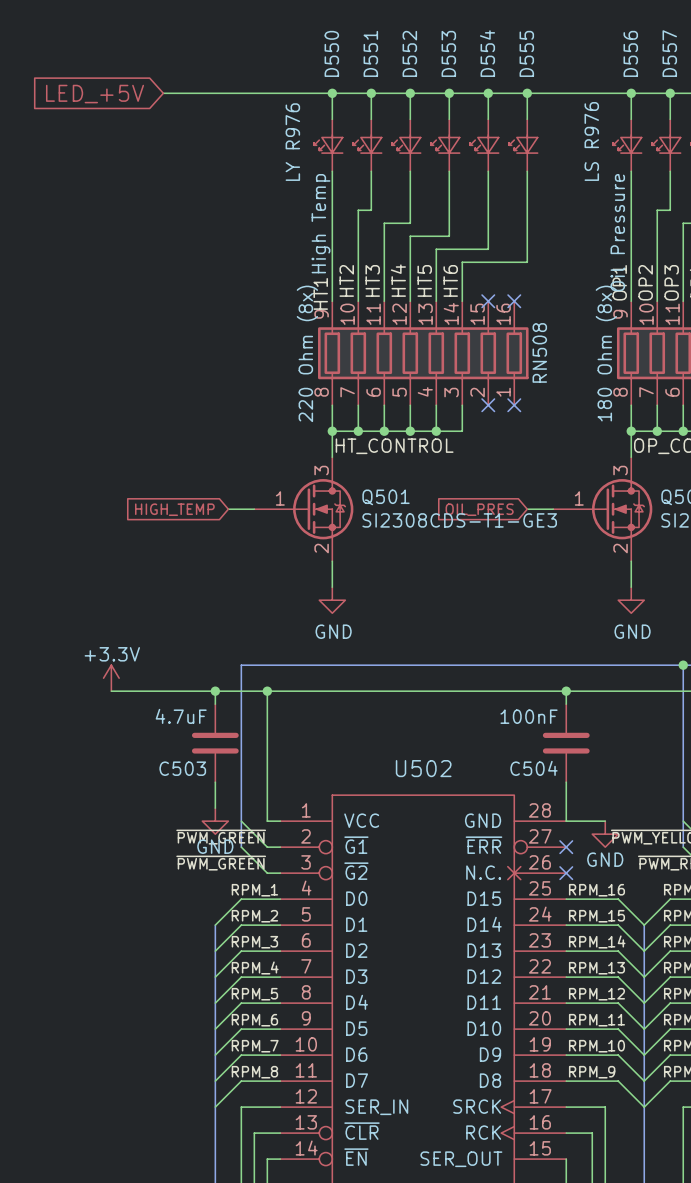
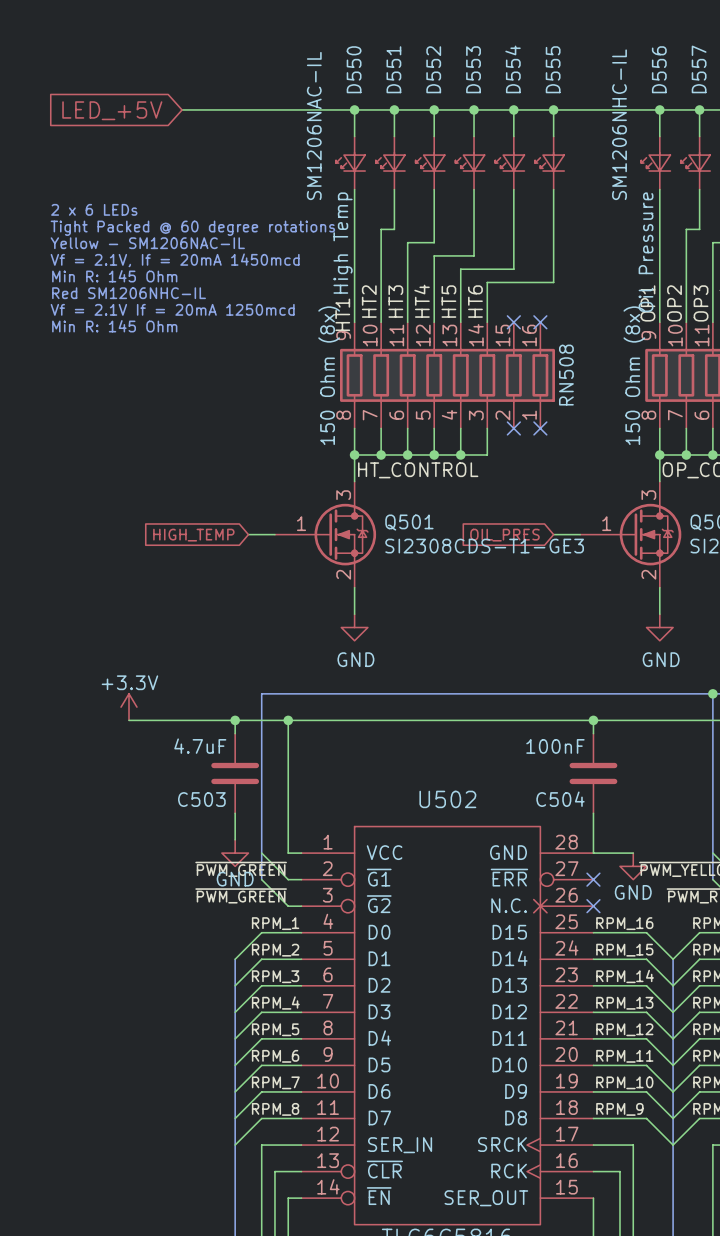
D556 value: LS R976 (591, 141) -> SM1206NHC-IL (619, 124)
D550 value: LY R976 (292, 142) -> SM1206NAC-IL (314, 125)
text: none -> 2 x 6 LEDs (94, 209)
text: none -> Tight Packed @ 60 degree rotations (192, 228)
text: none -> Yellow - SM1206NAC-IL (147, 243)
text: none -> Vf = 2.1V, If = 20mA 1450mcd (175, 260)
text: none -> Min R: 145 Ohm (114, 276)
text: none -> Red SM1206NHC-IL (129, 293)
text: none -> Vf = 2.1V If = 20mA 1250mcd (172, 309)
text: none -> Min R: 145 Ohm (114, 326)
RN508 value: 220 Ohm (8x) (307, 353) -> 150 Ohm (8x) (329, 375)
part value: 180 Ohm (8x) (606, 353) -> 150 Ohm (8x) (634, 375)

